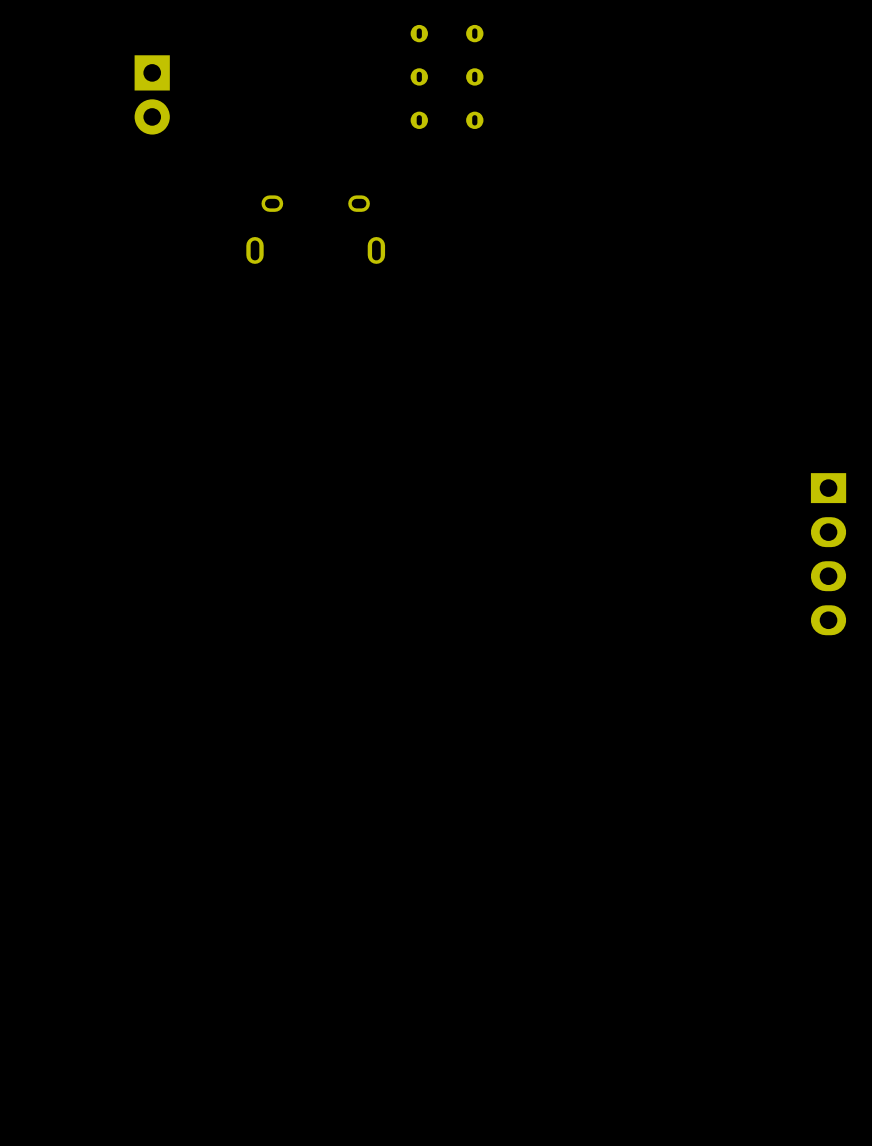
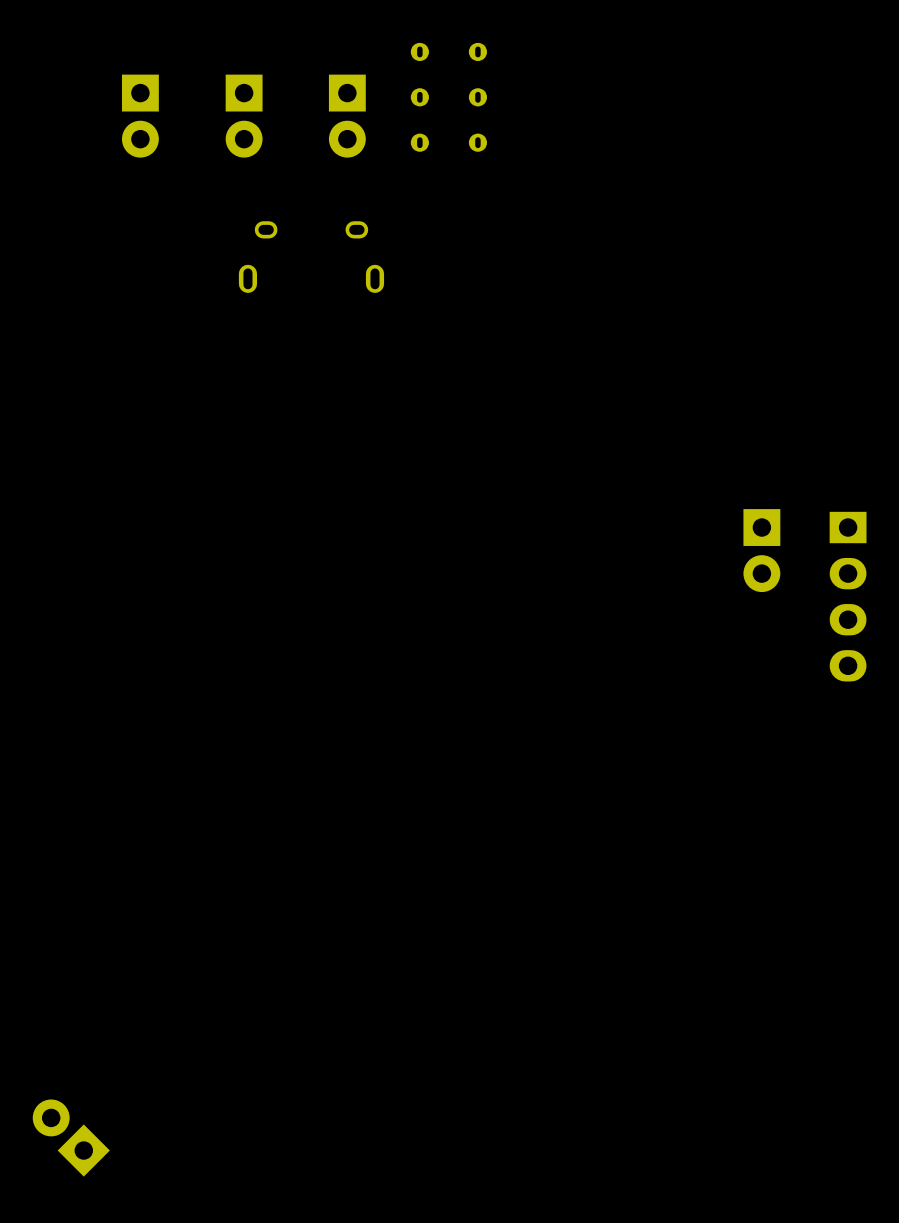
part: none -> (244, 116)
part: none -> (347, 116)
part: none -> (761, 550)
part: none -> (71, 1138)

